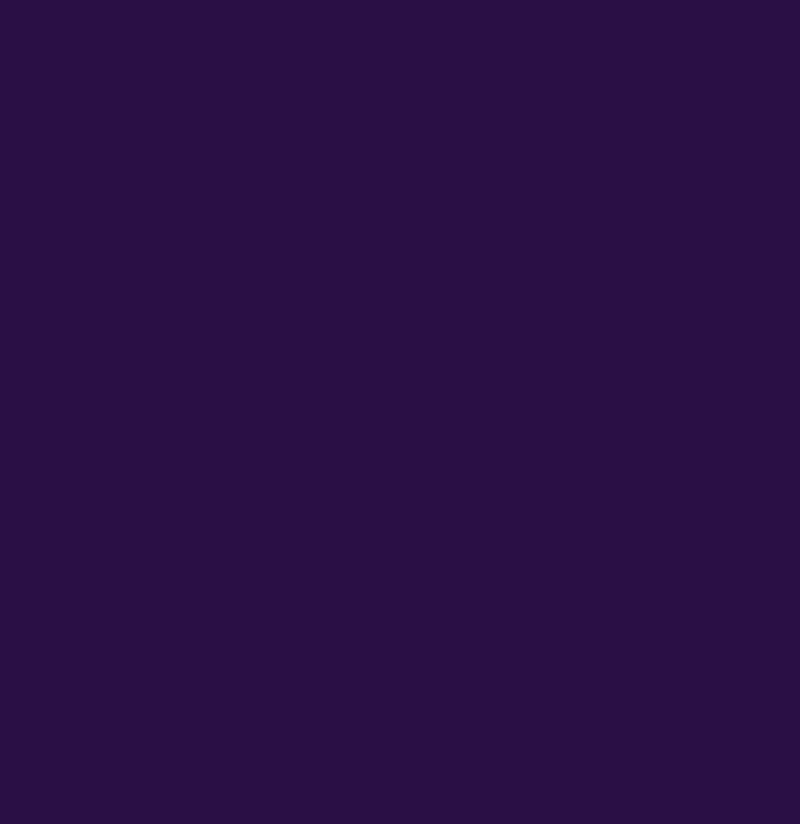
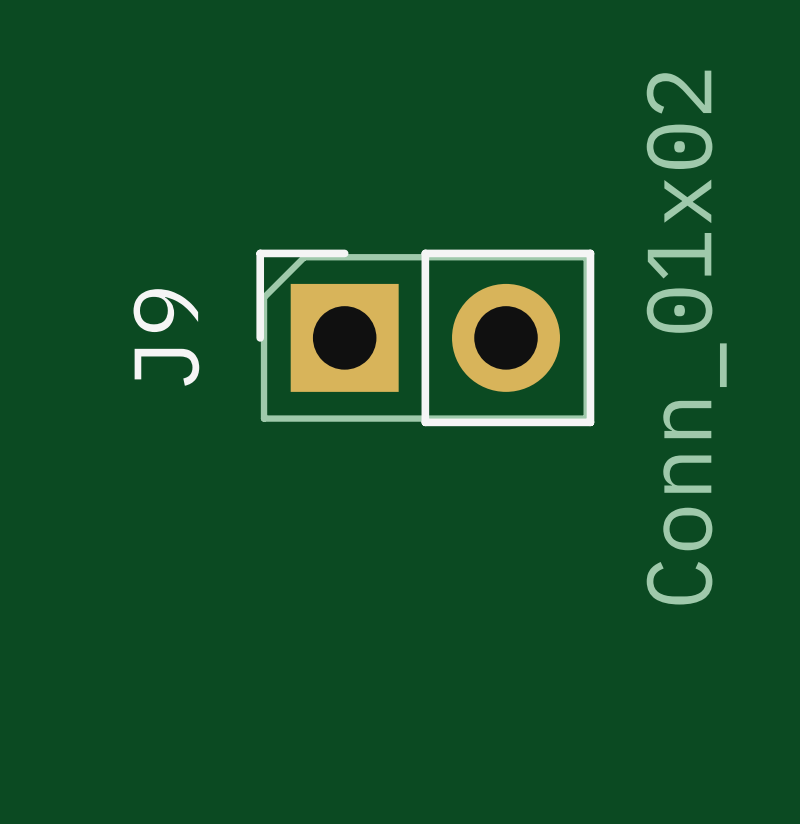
J9: none -> Conn_01x02 (425, 337)

